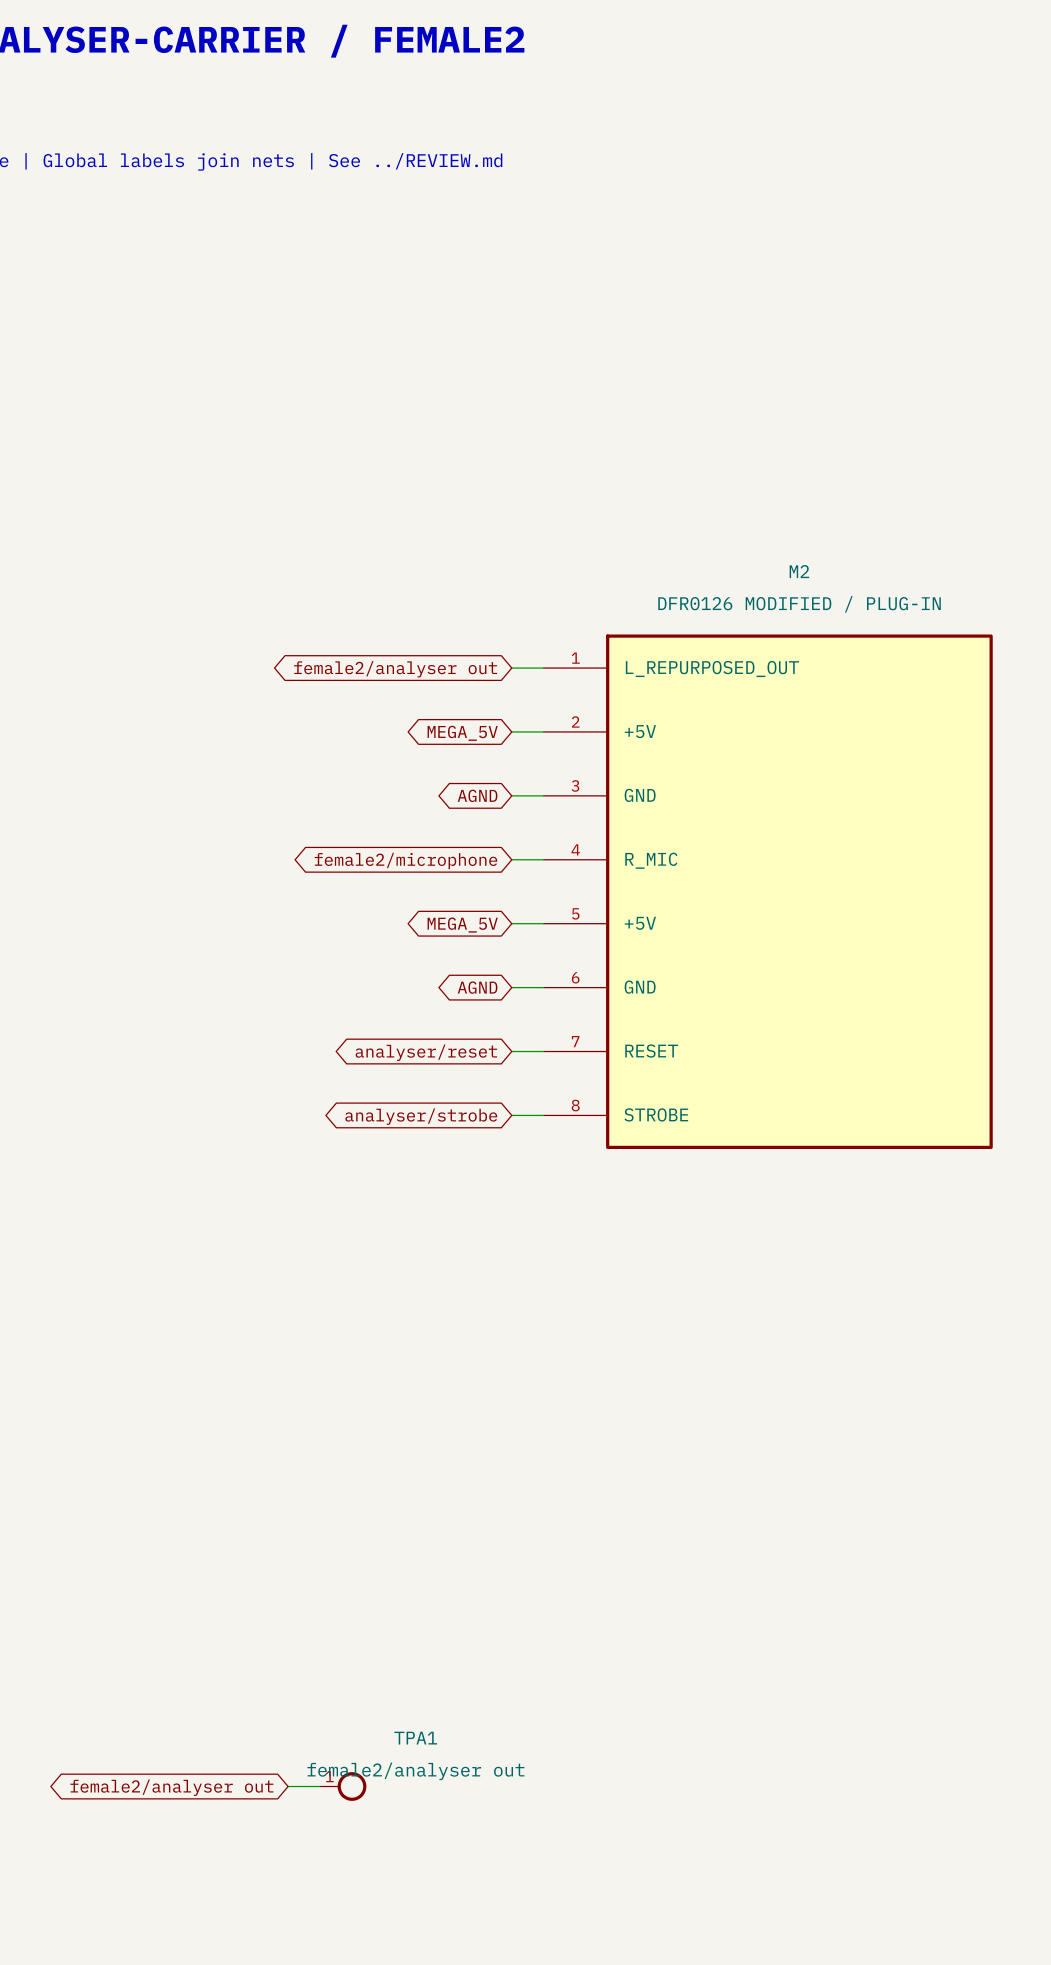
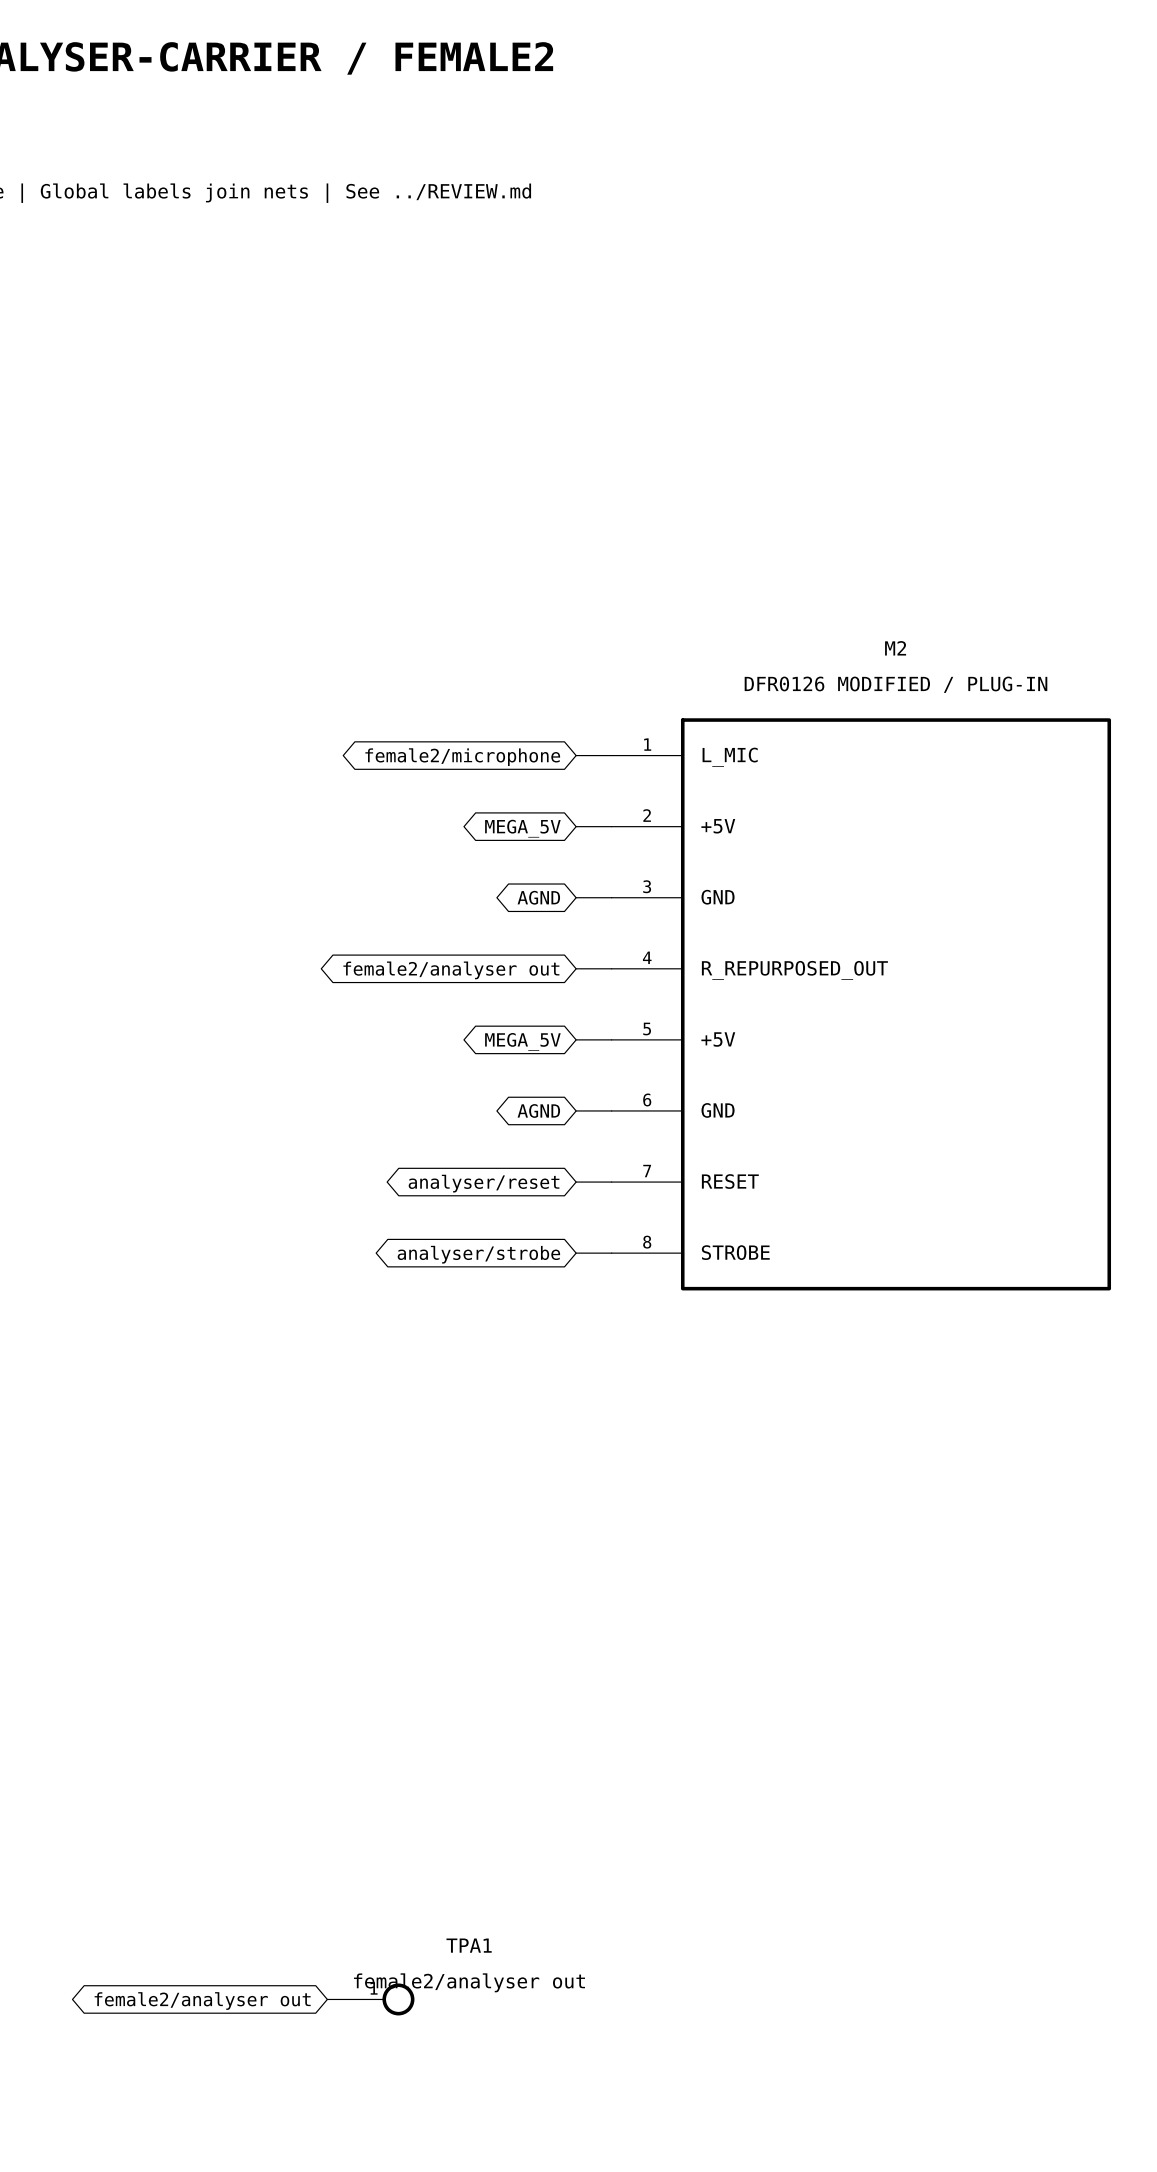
global label: female2/analyser out (395, 669) -> female2/microphone (462, 757)
M2 pin name: L_REPURPOSED_OUT (712, 669) -> L_MIC (730, 757)
global label: female2/microphone (405, 860) -> female2/analyser out (451, 970)
M2 pin name: R_MIC (651, 860) -> R_REPURPOSED_OUT (794, 970)

